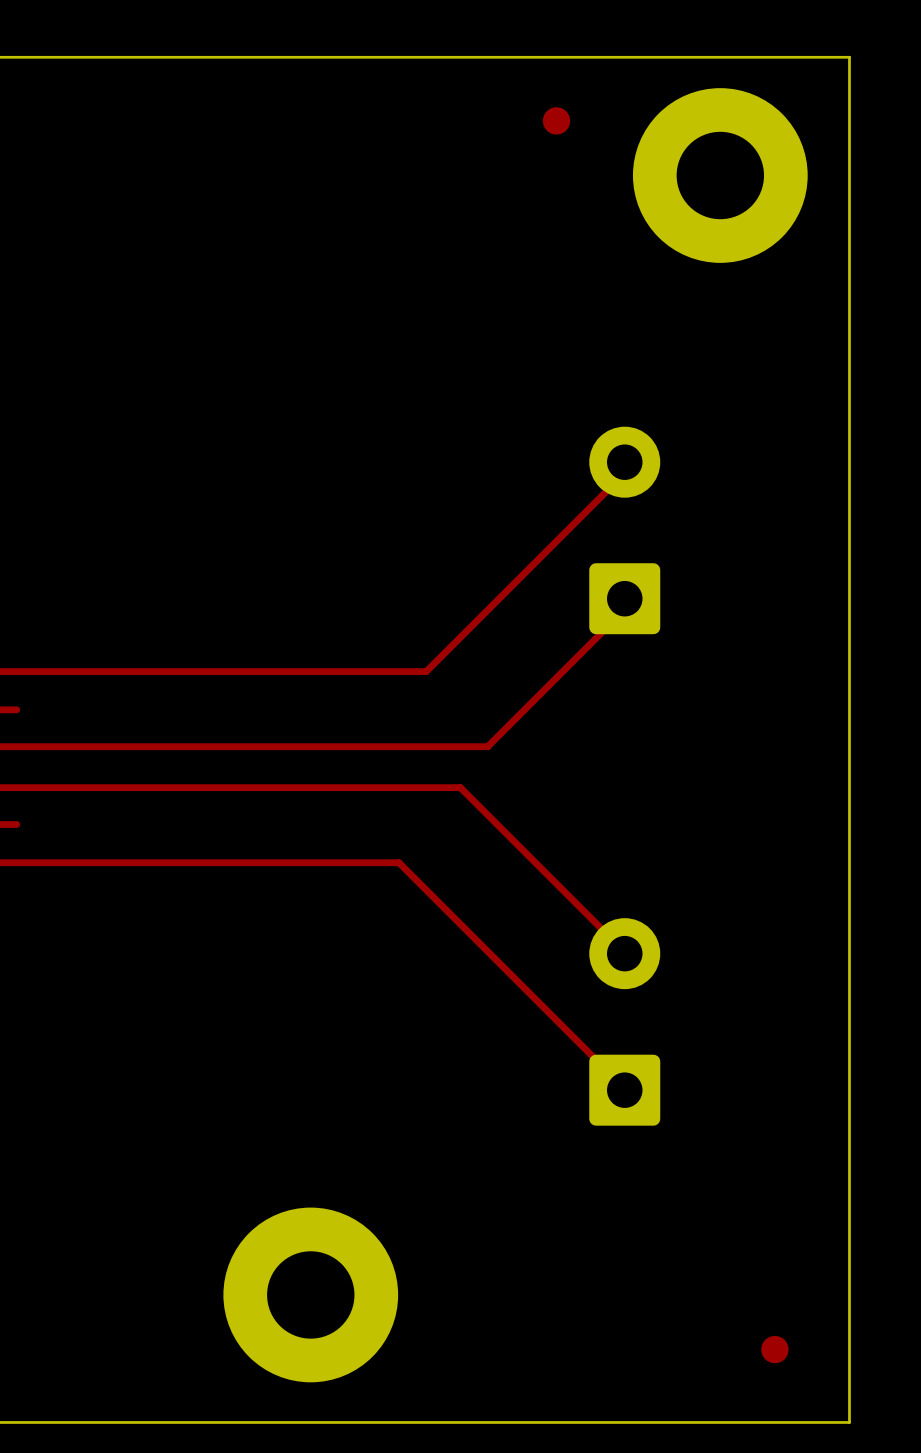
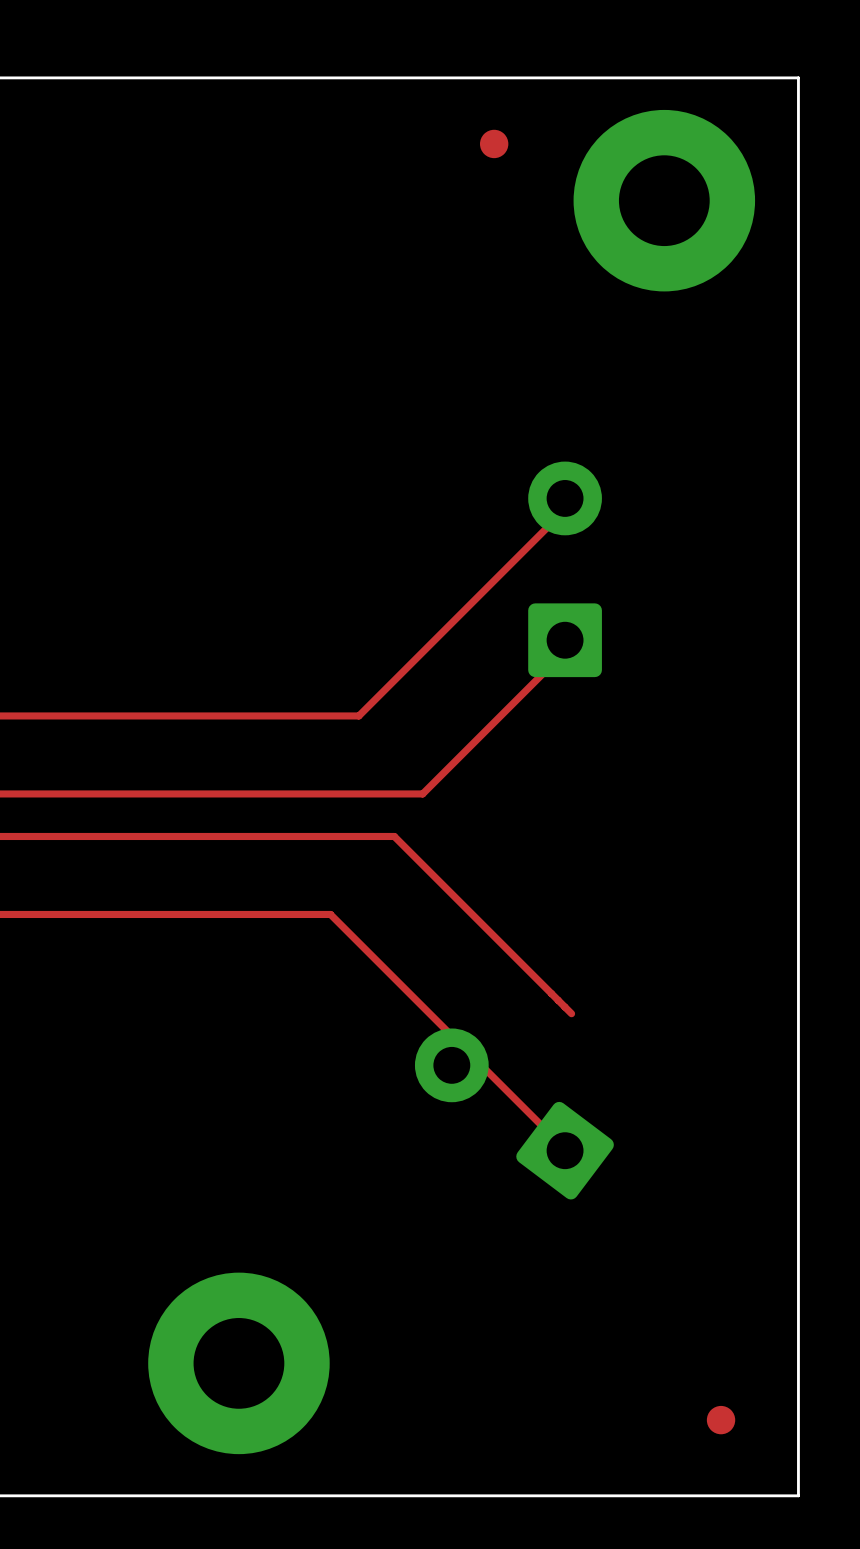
part: (624, 1021) -> none
part: none -> (514, 1113)

